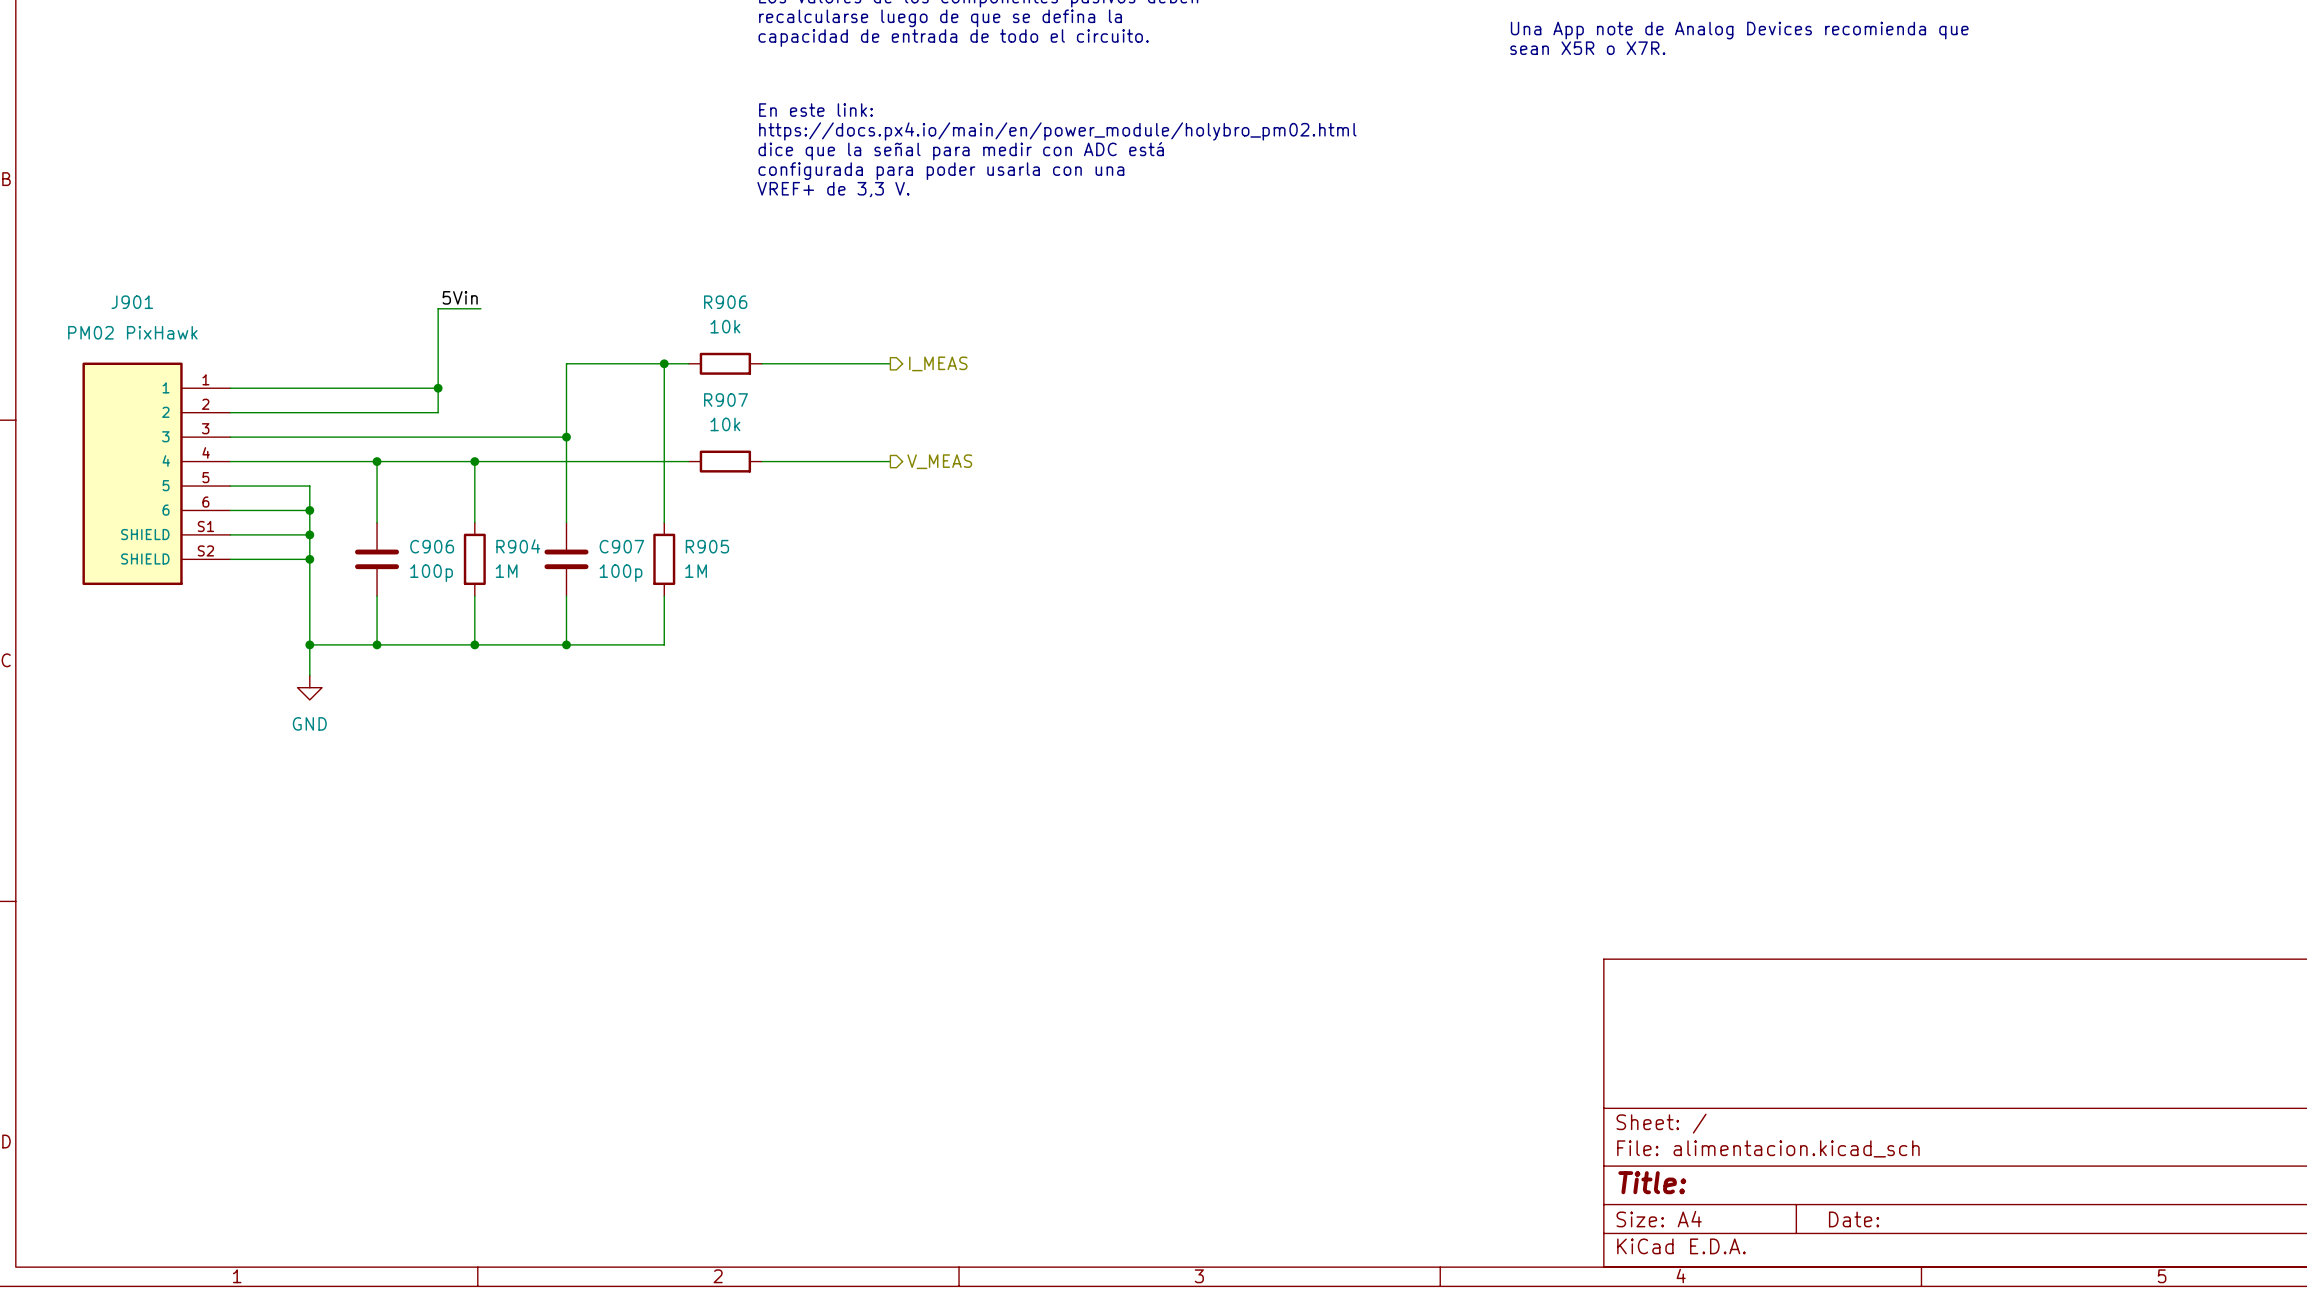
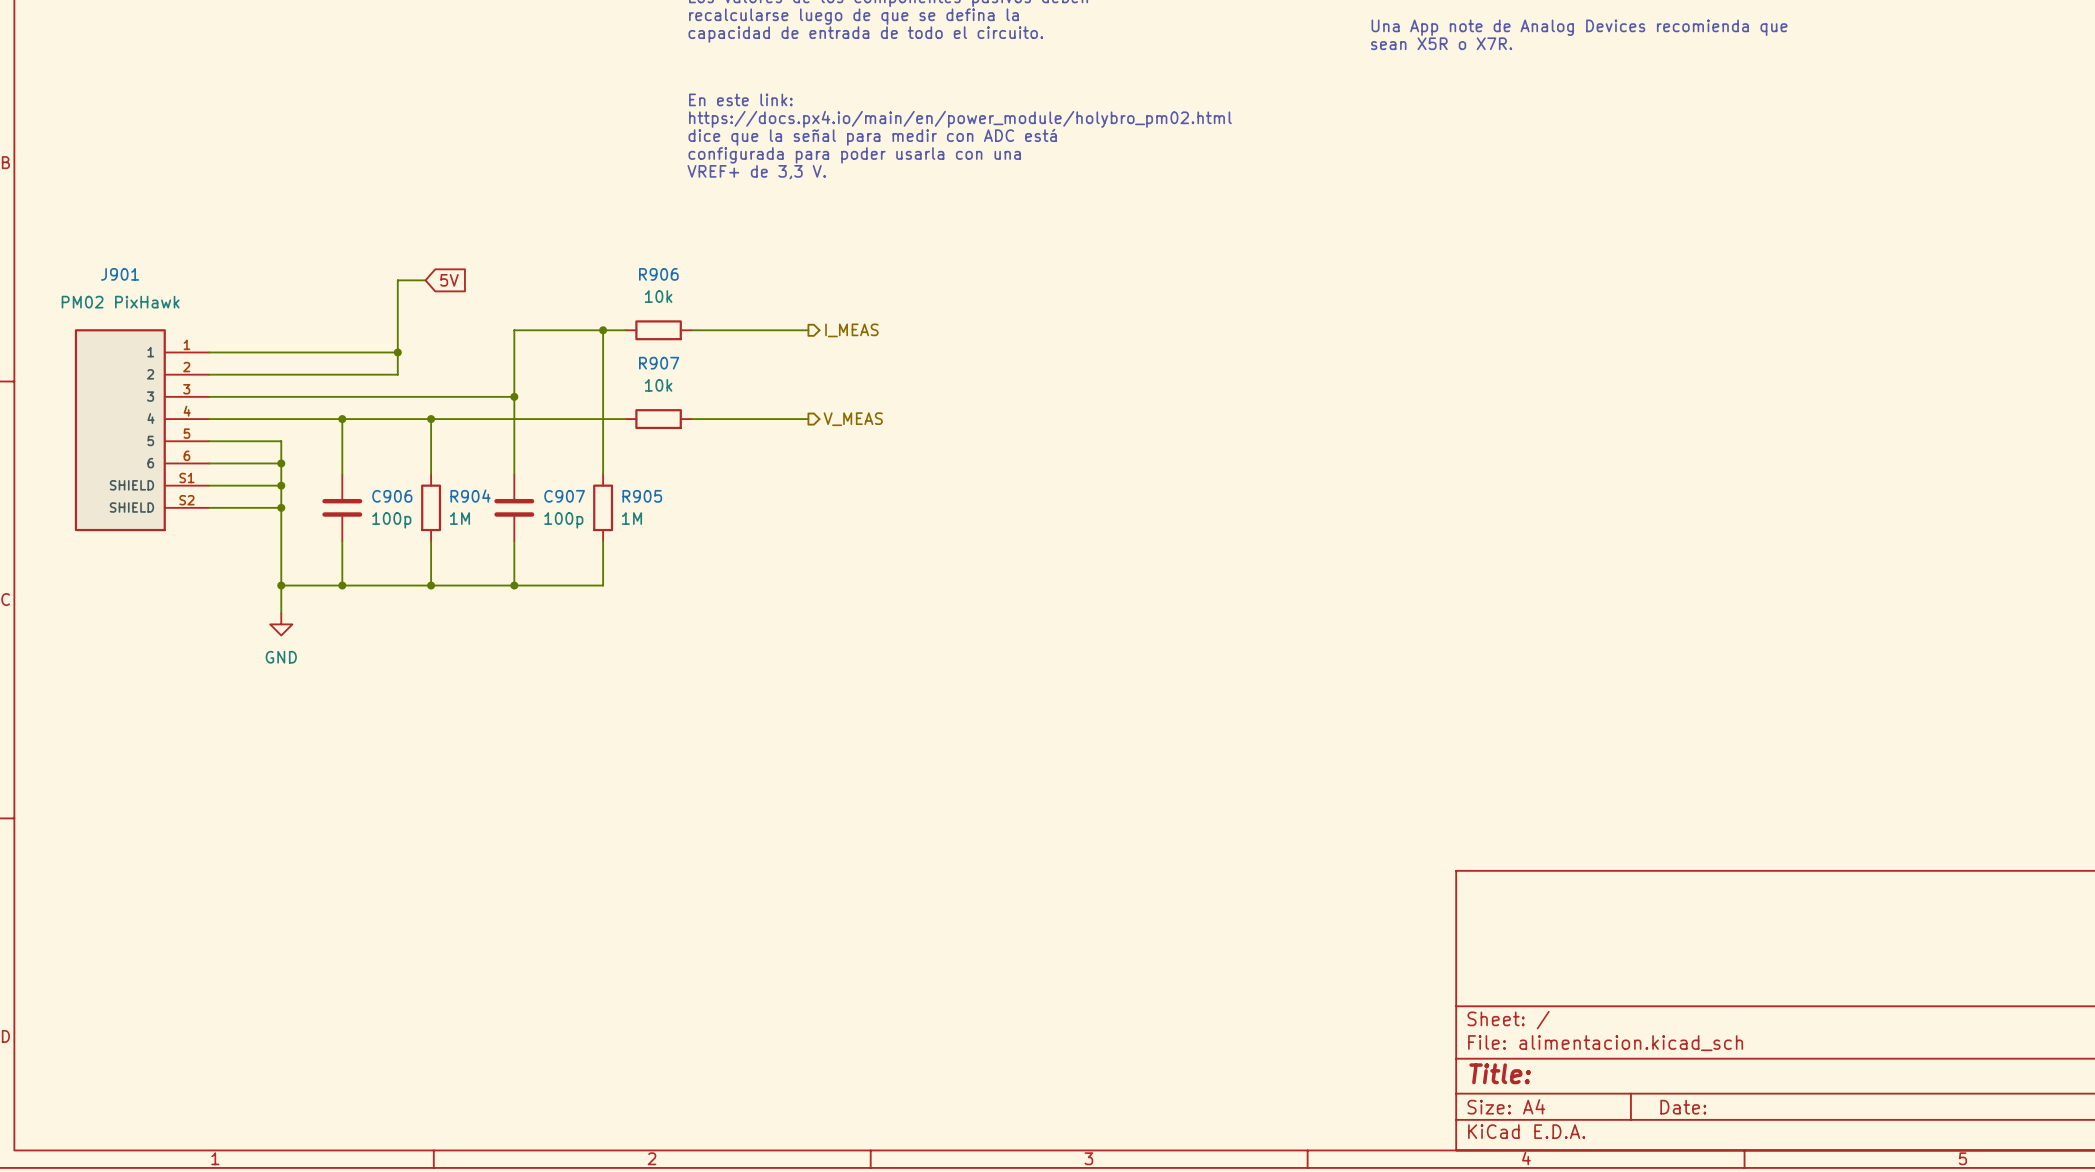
label: 5Vin (460, 297) -> none
wire: (468, 308) (480, 308) -> none
global label: none -> 5V (449, 280)

